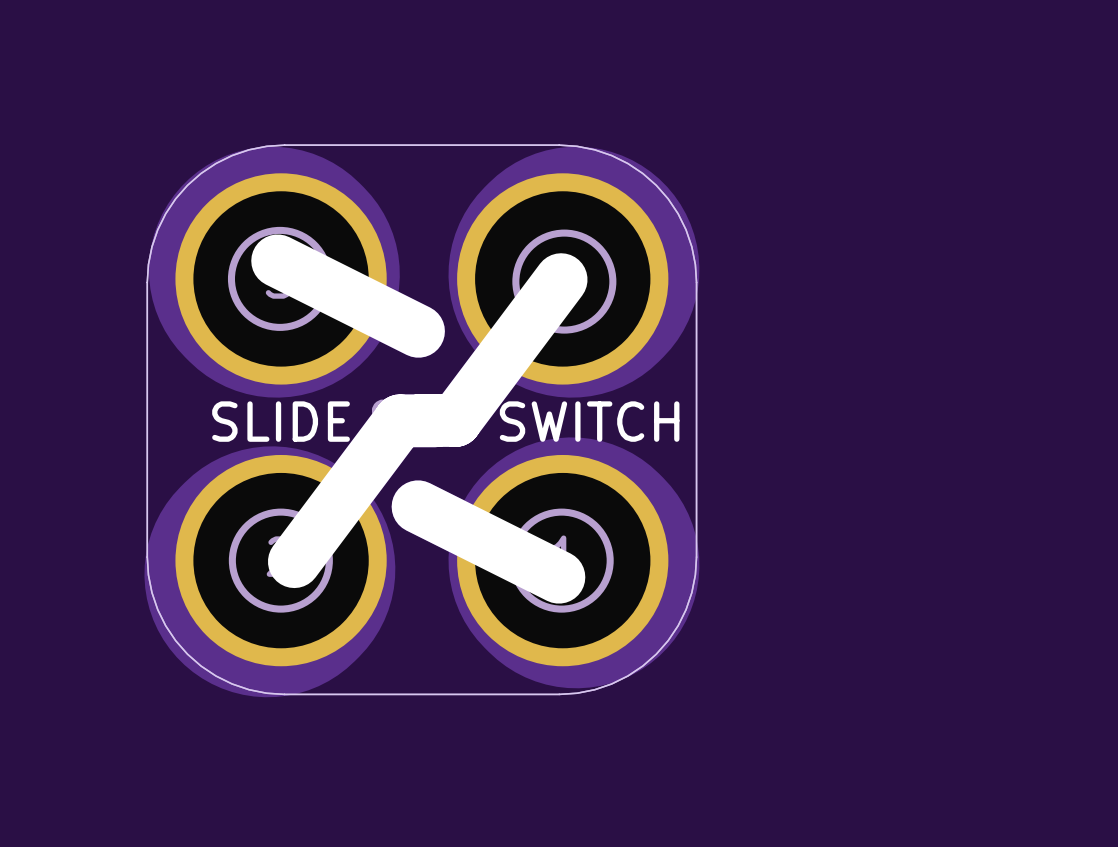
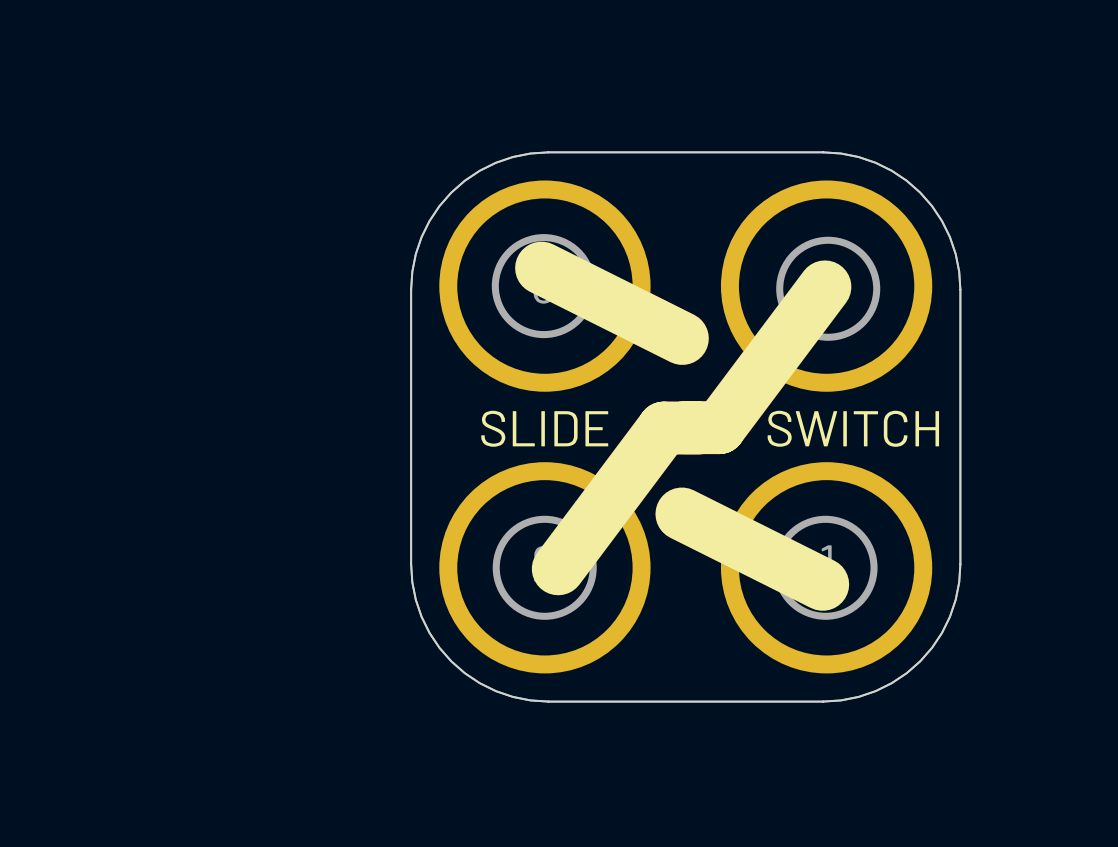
part footprint: [144, 144, 700, 698] -> [410, 151, 962, 703]

